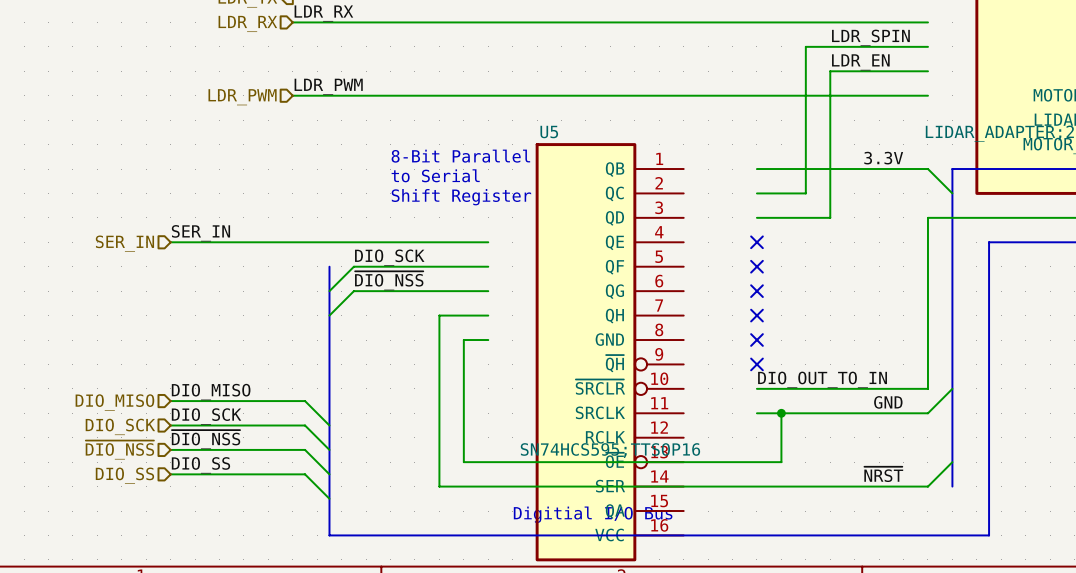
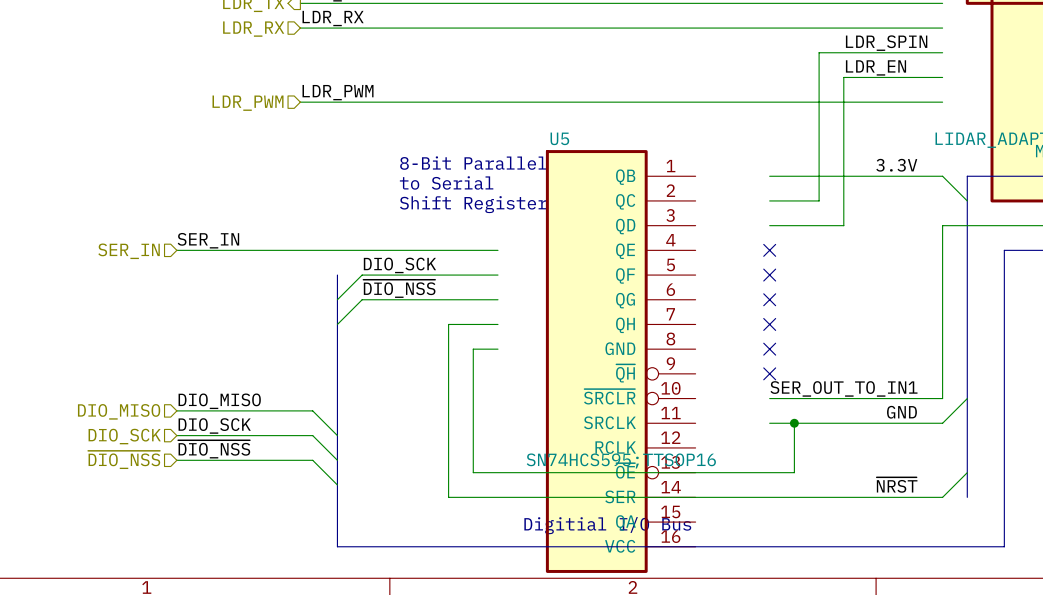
label: DIO_OUT_TO_IN (822, 379) -> SER_OUT_TO_IN1 (843, 388)
label: DIO_SS (200, 465) -> none
wire: (170, 474) (305, 474) (329, 498) -> none
hierarchical label: DIO_SS (124, 475) -> none

